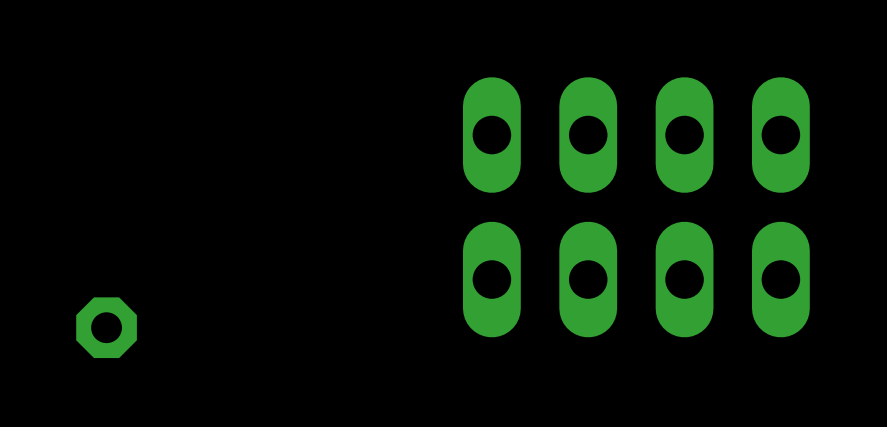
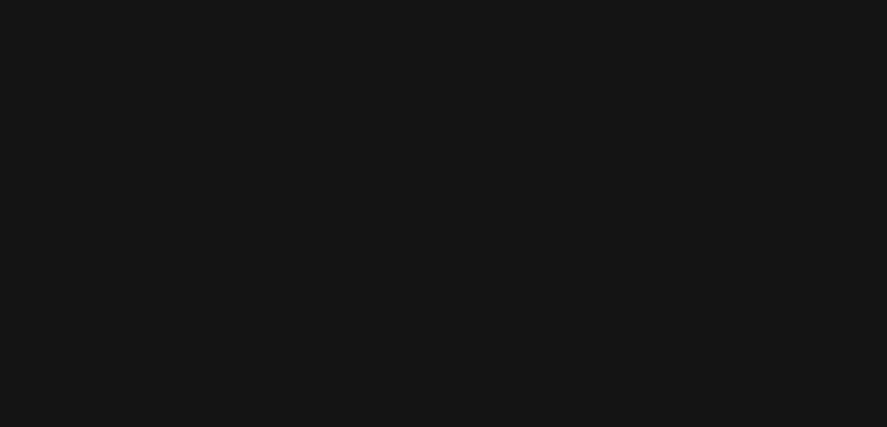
part: (636, 135) -> none
part: (636, 279) -> none
part: (106, 327) -> none

